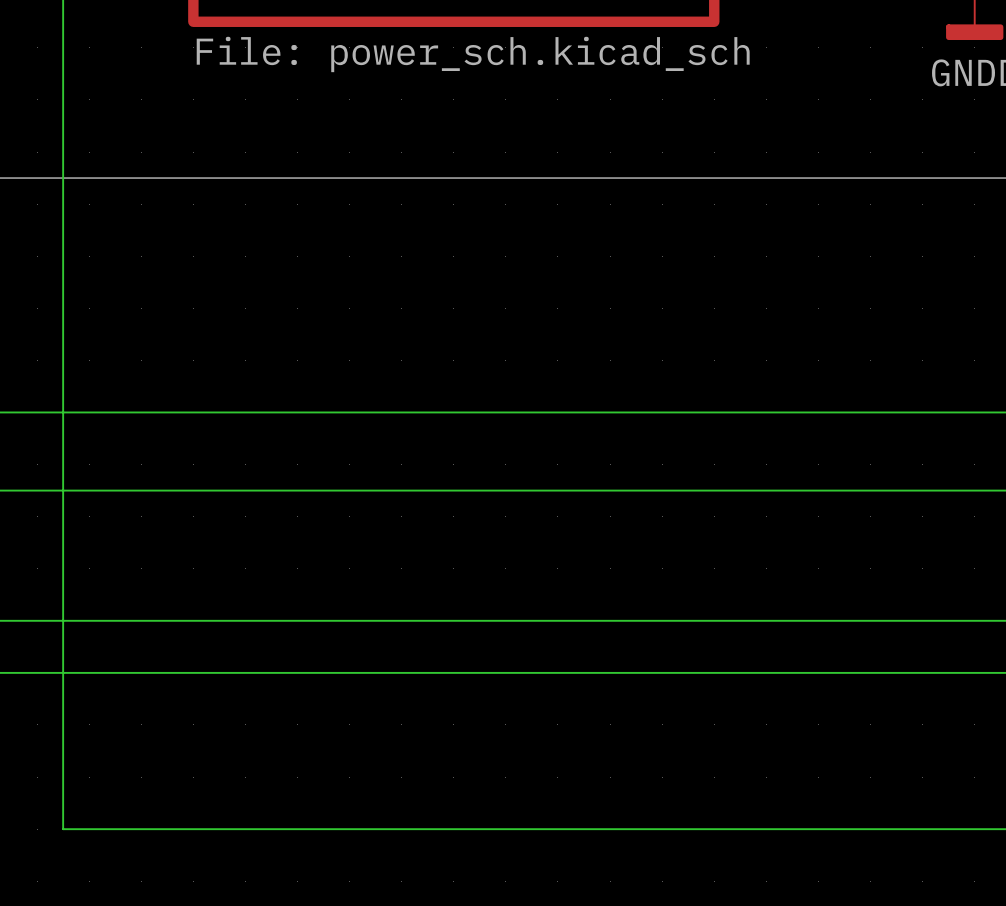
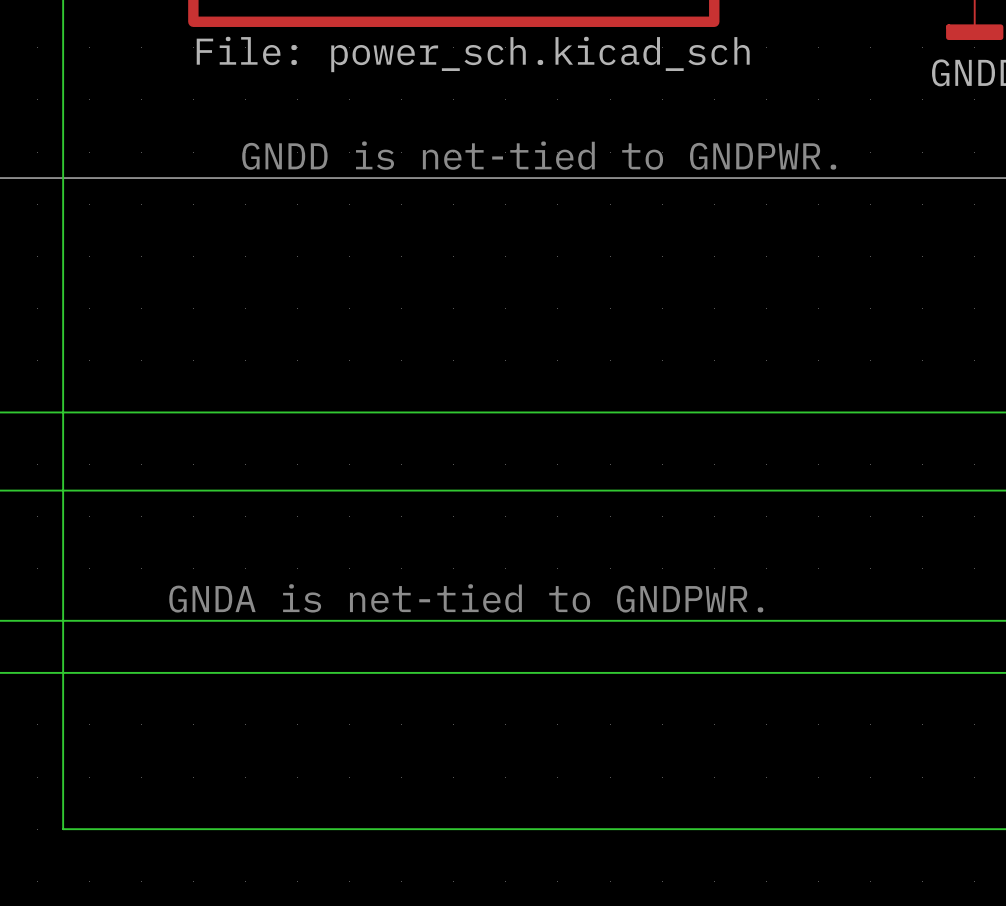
text: none -> GNDD is net-tied to GNDPWR. (539, 155)
text: none -> GNDA is net-tied to GNDPWR. (466, 598)

